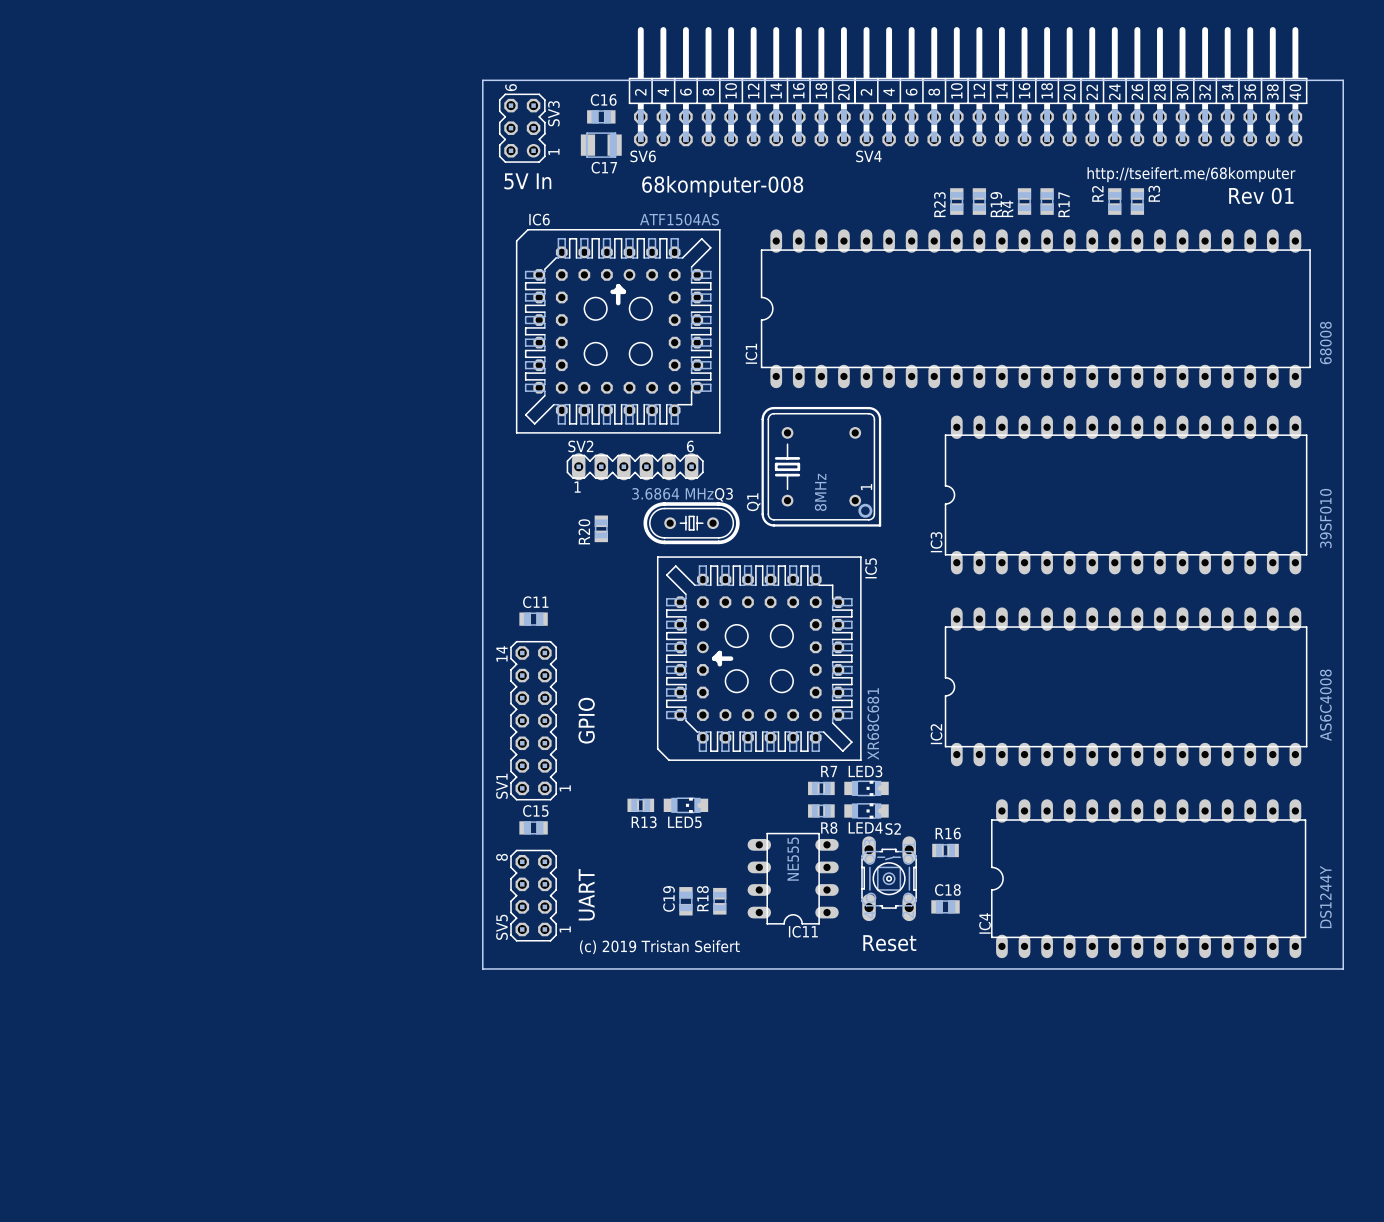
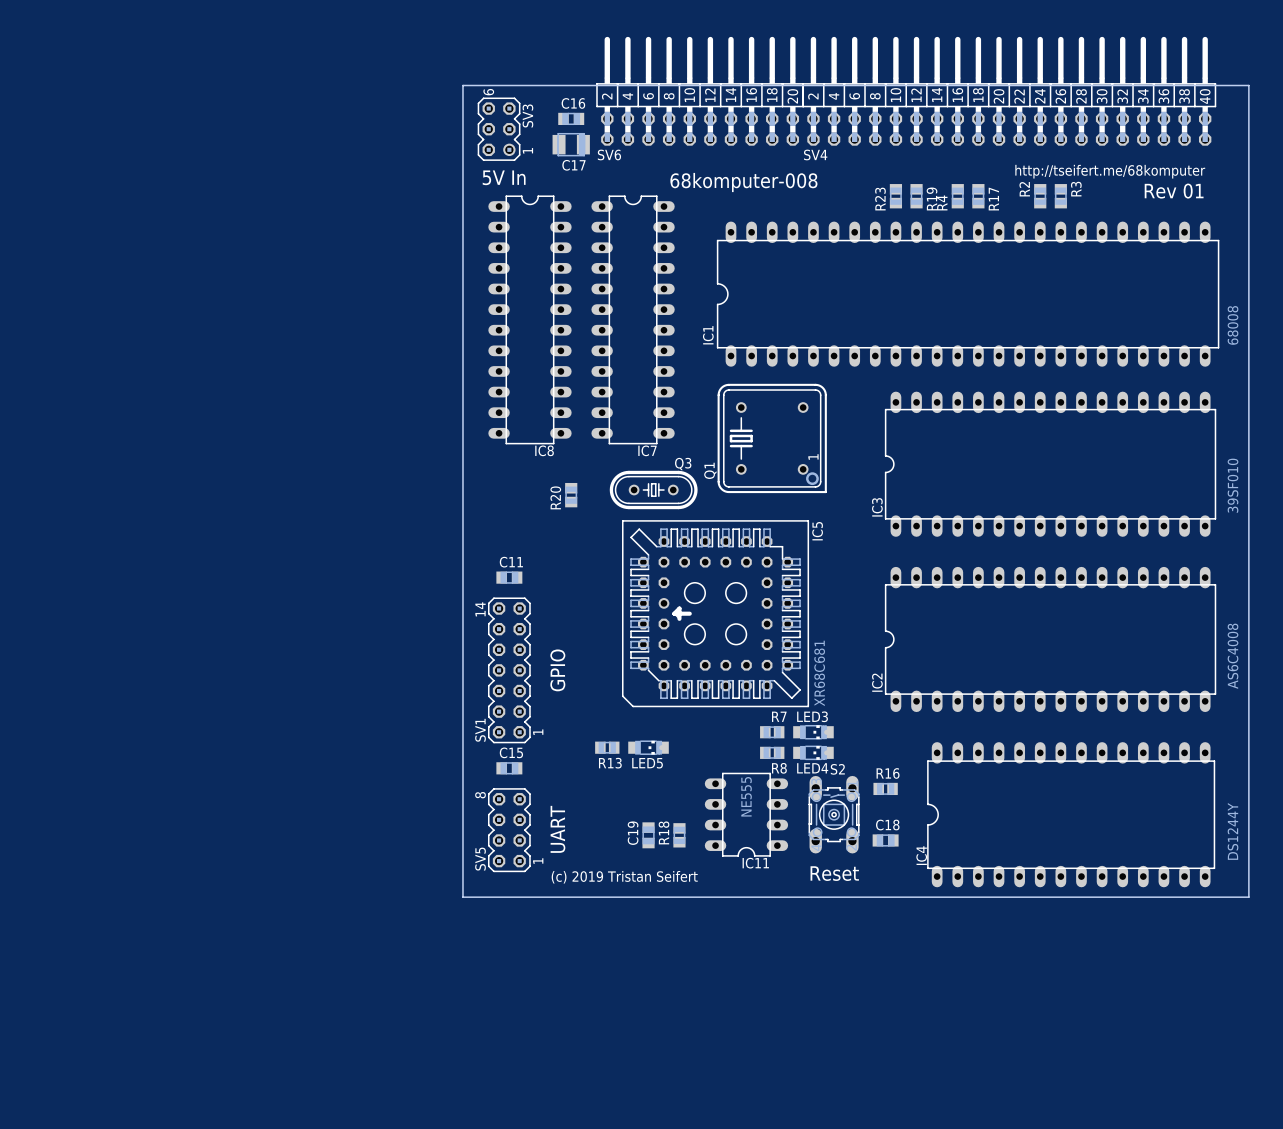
text position: 68komputer-008 (722, 186) -> 68komputer-008 (743, 182)
IC6: ATF1504AS (618, 331) -> none
IC8: none -> (529, 319)
IC7: none -> (633, 319)
SV2: (635, 466) -> none
Q1 value: 8MHz (820, 492) -> none
Q3 value: 3.6864 MHz (672, 493) -> none

